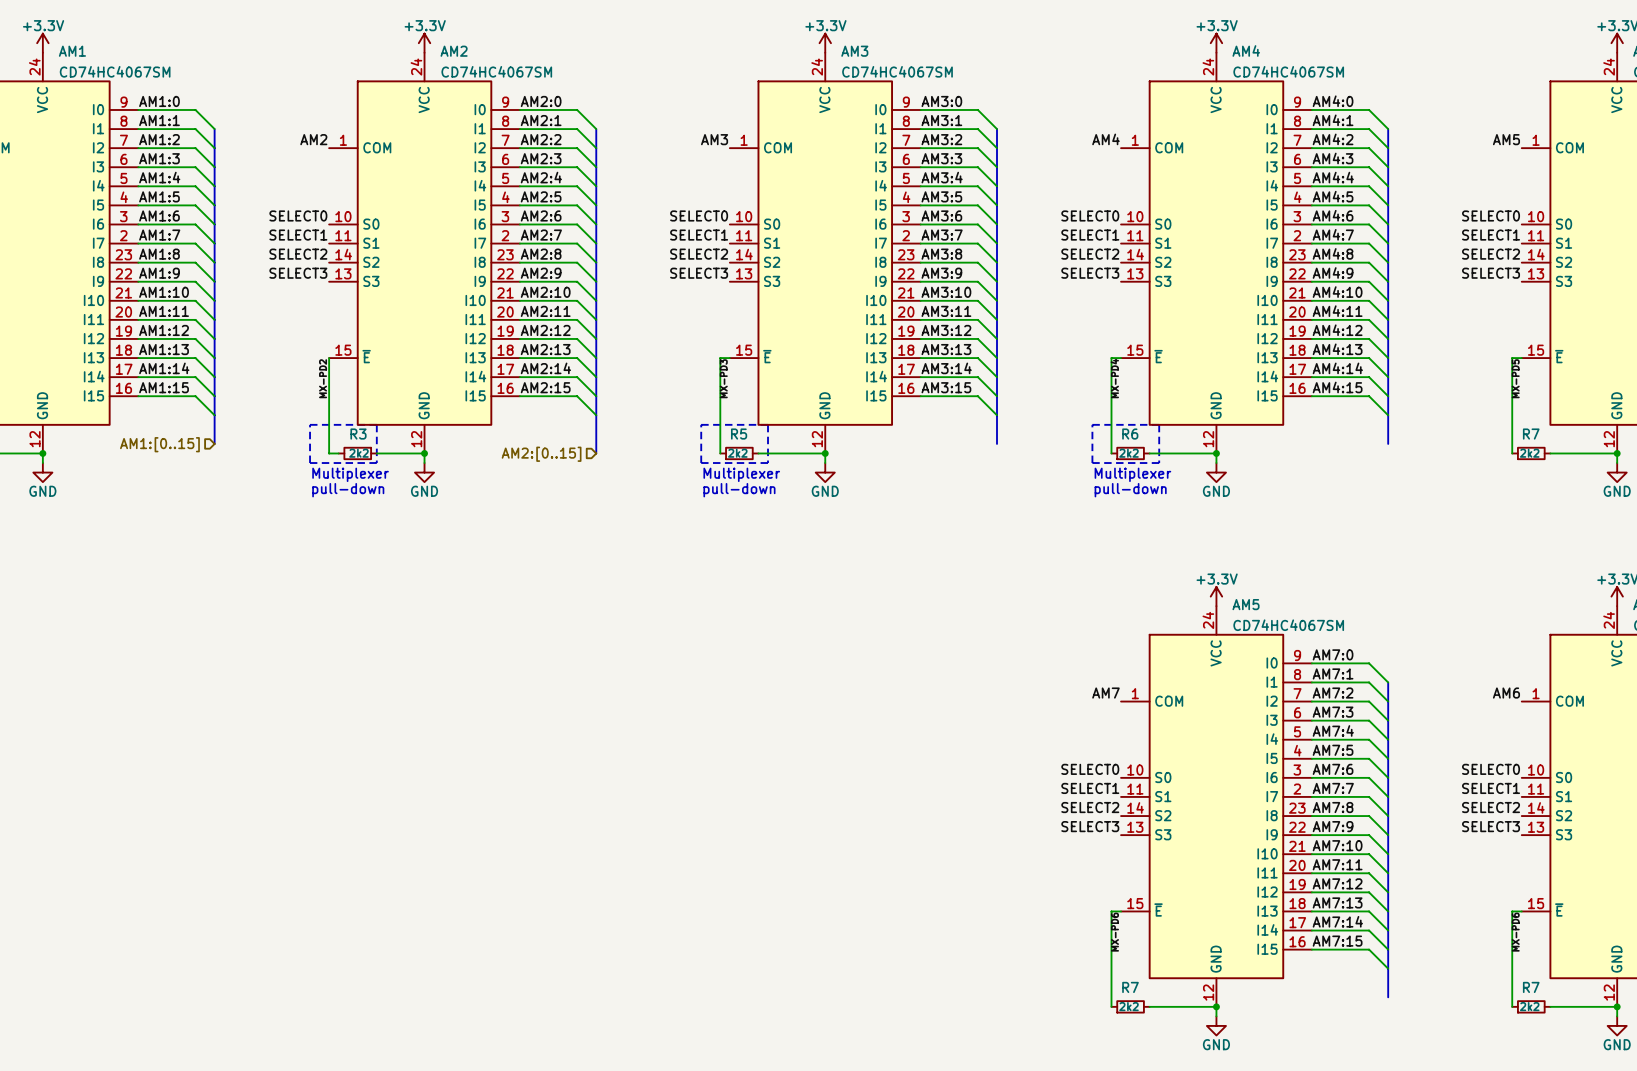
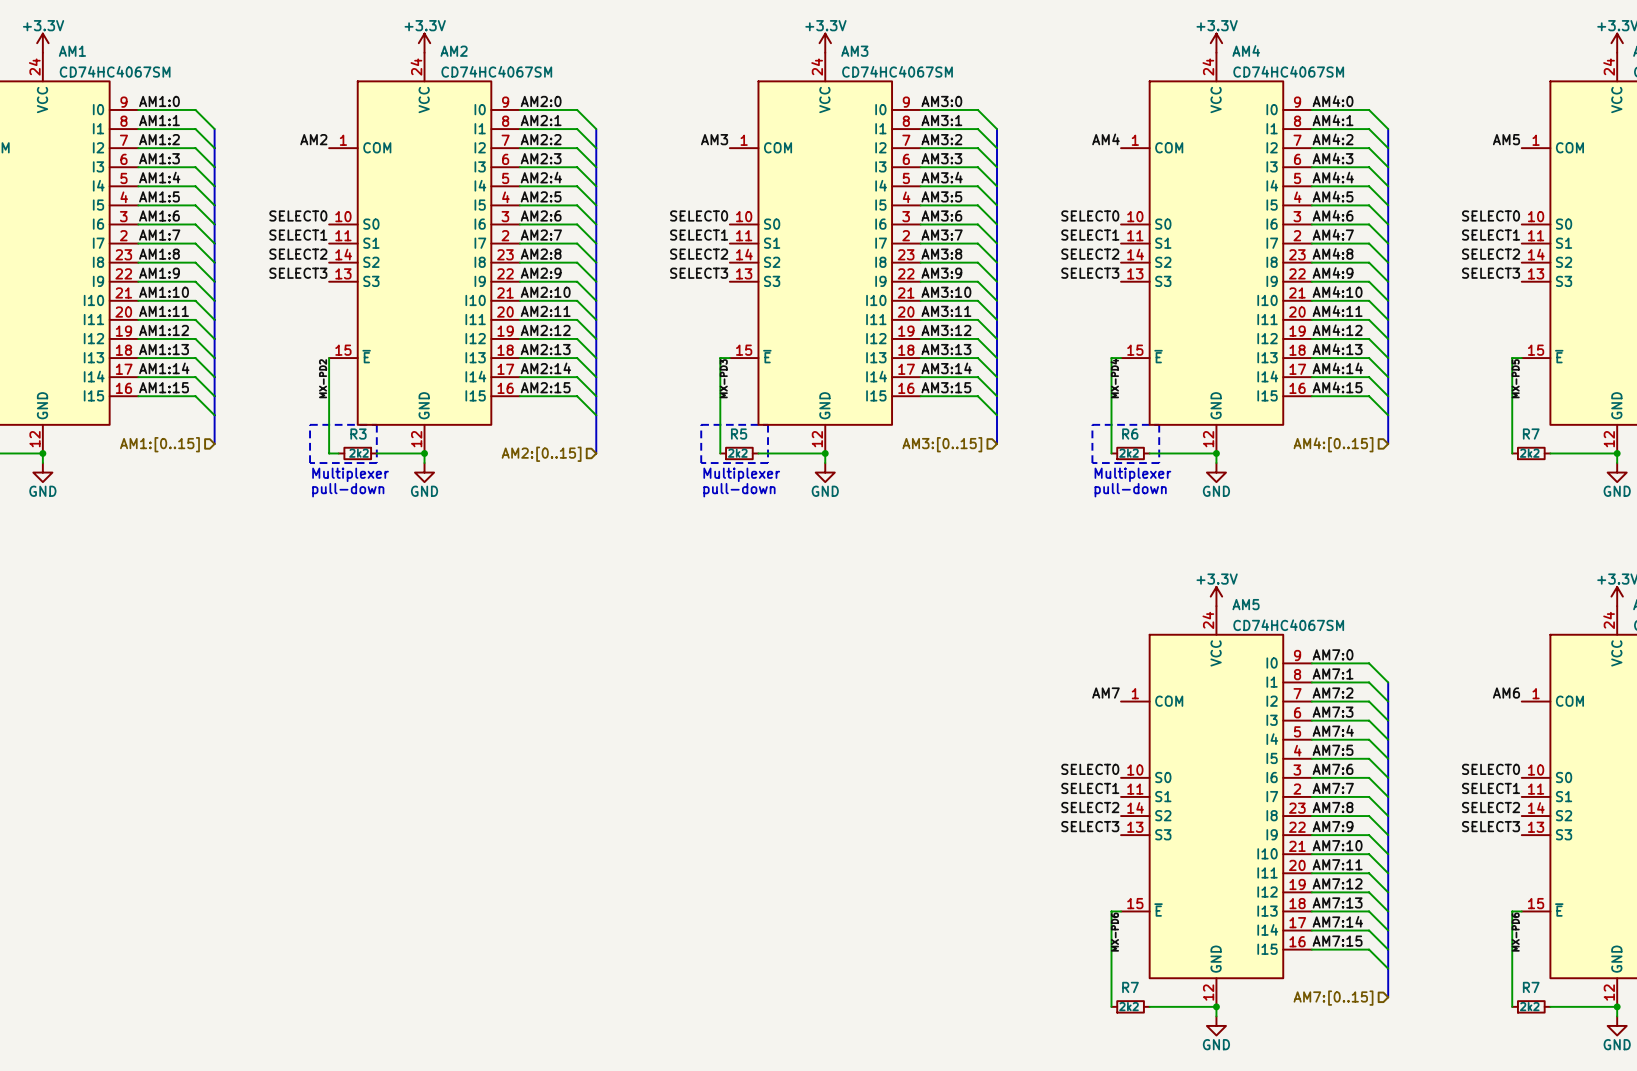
hierarchical label: none -> AM3:[0..15] (942, 444)
hierarchical label: none -> AM4:[0..15] (1333, 444)
hierarchical label: none -> AM7:[0..15] (1333, 998)

